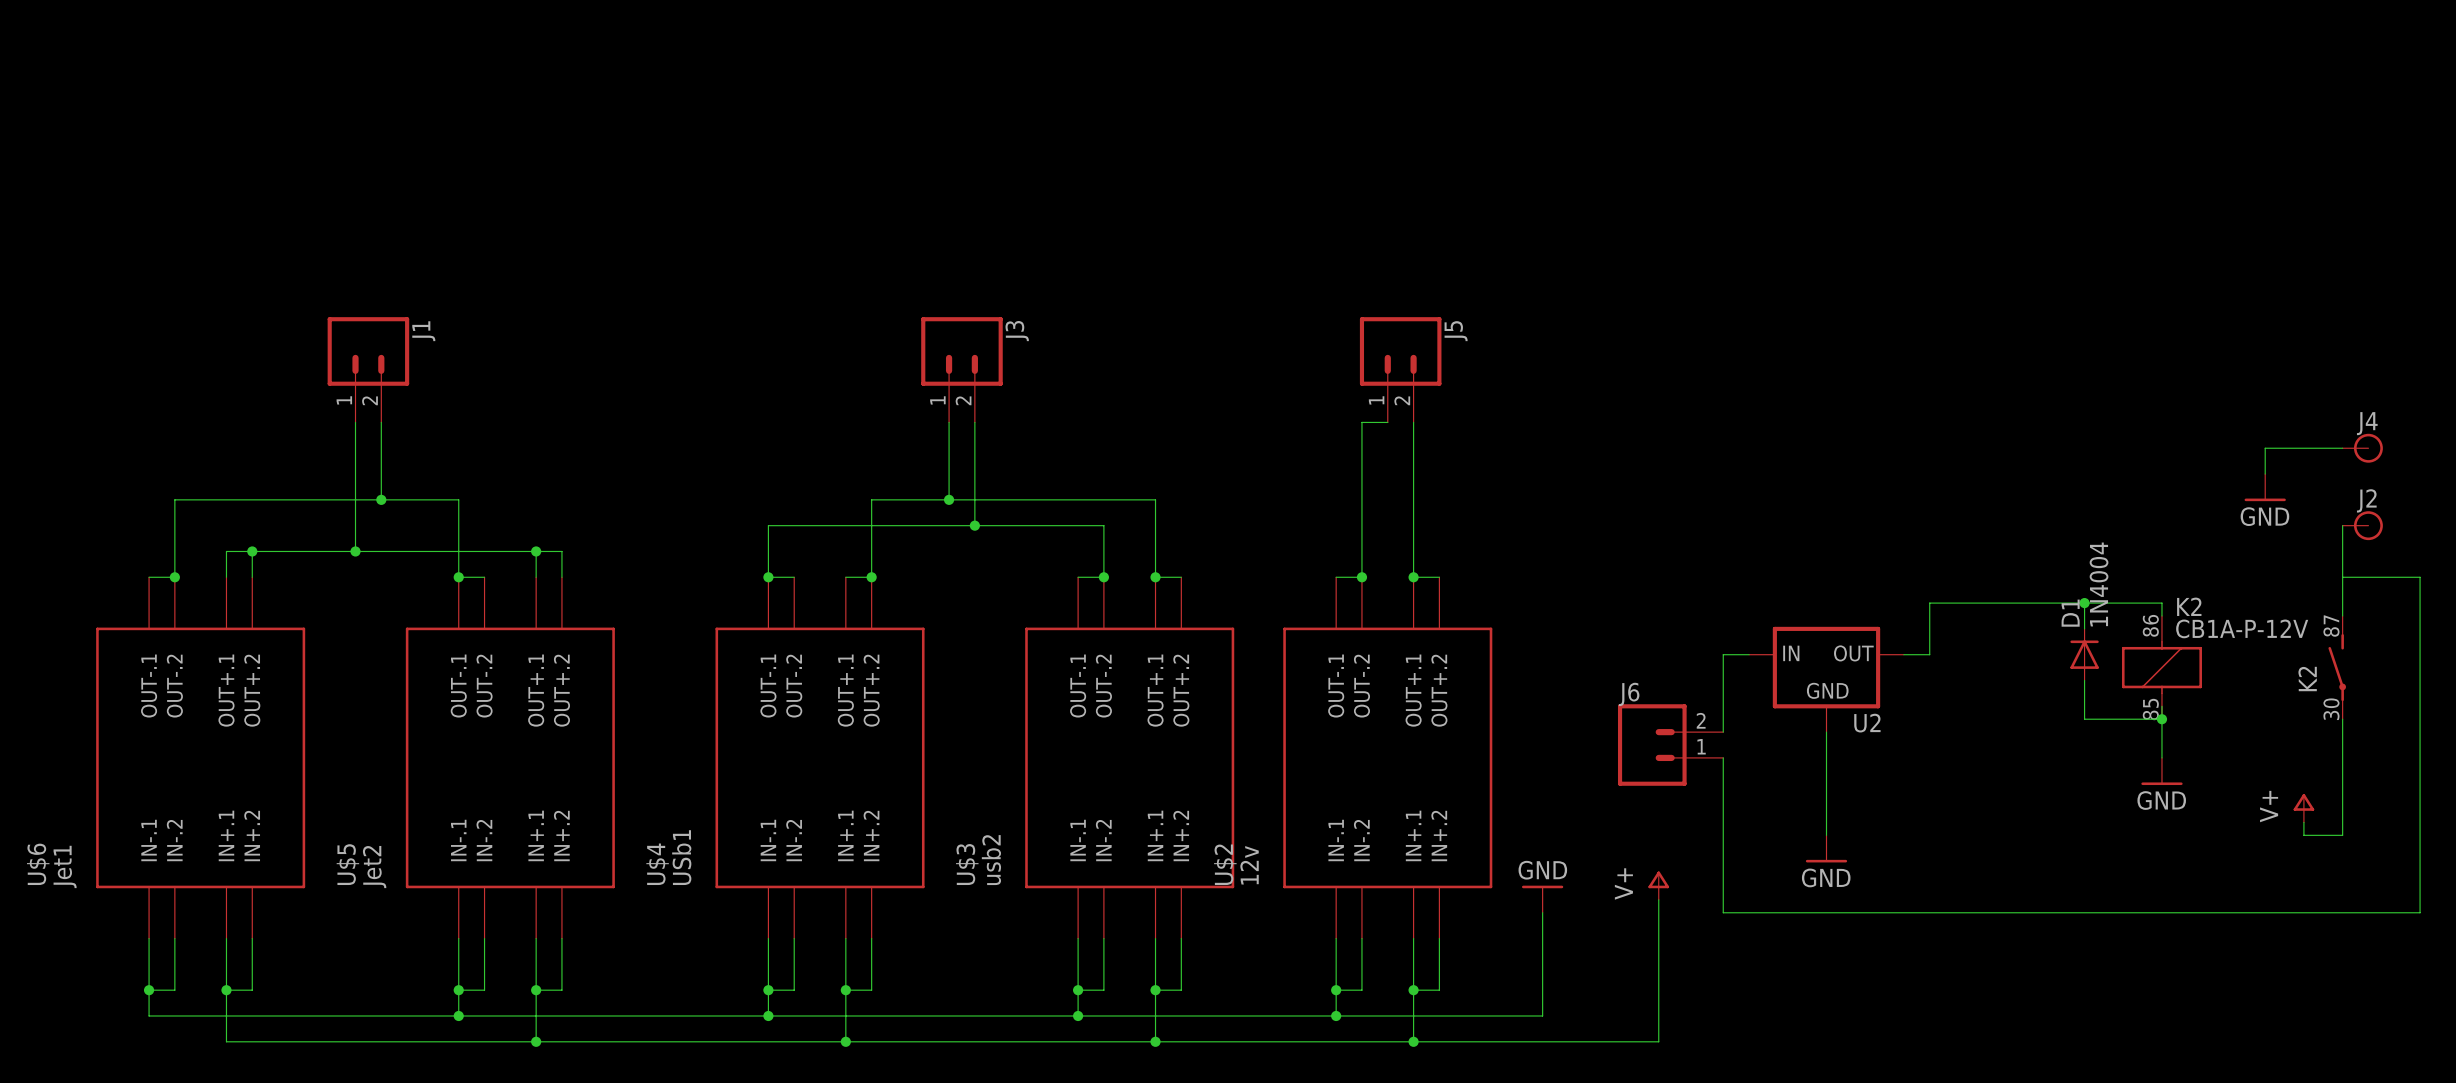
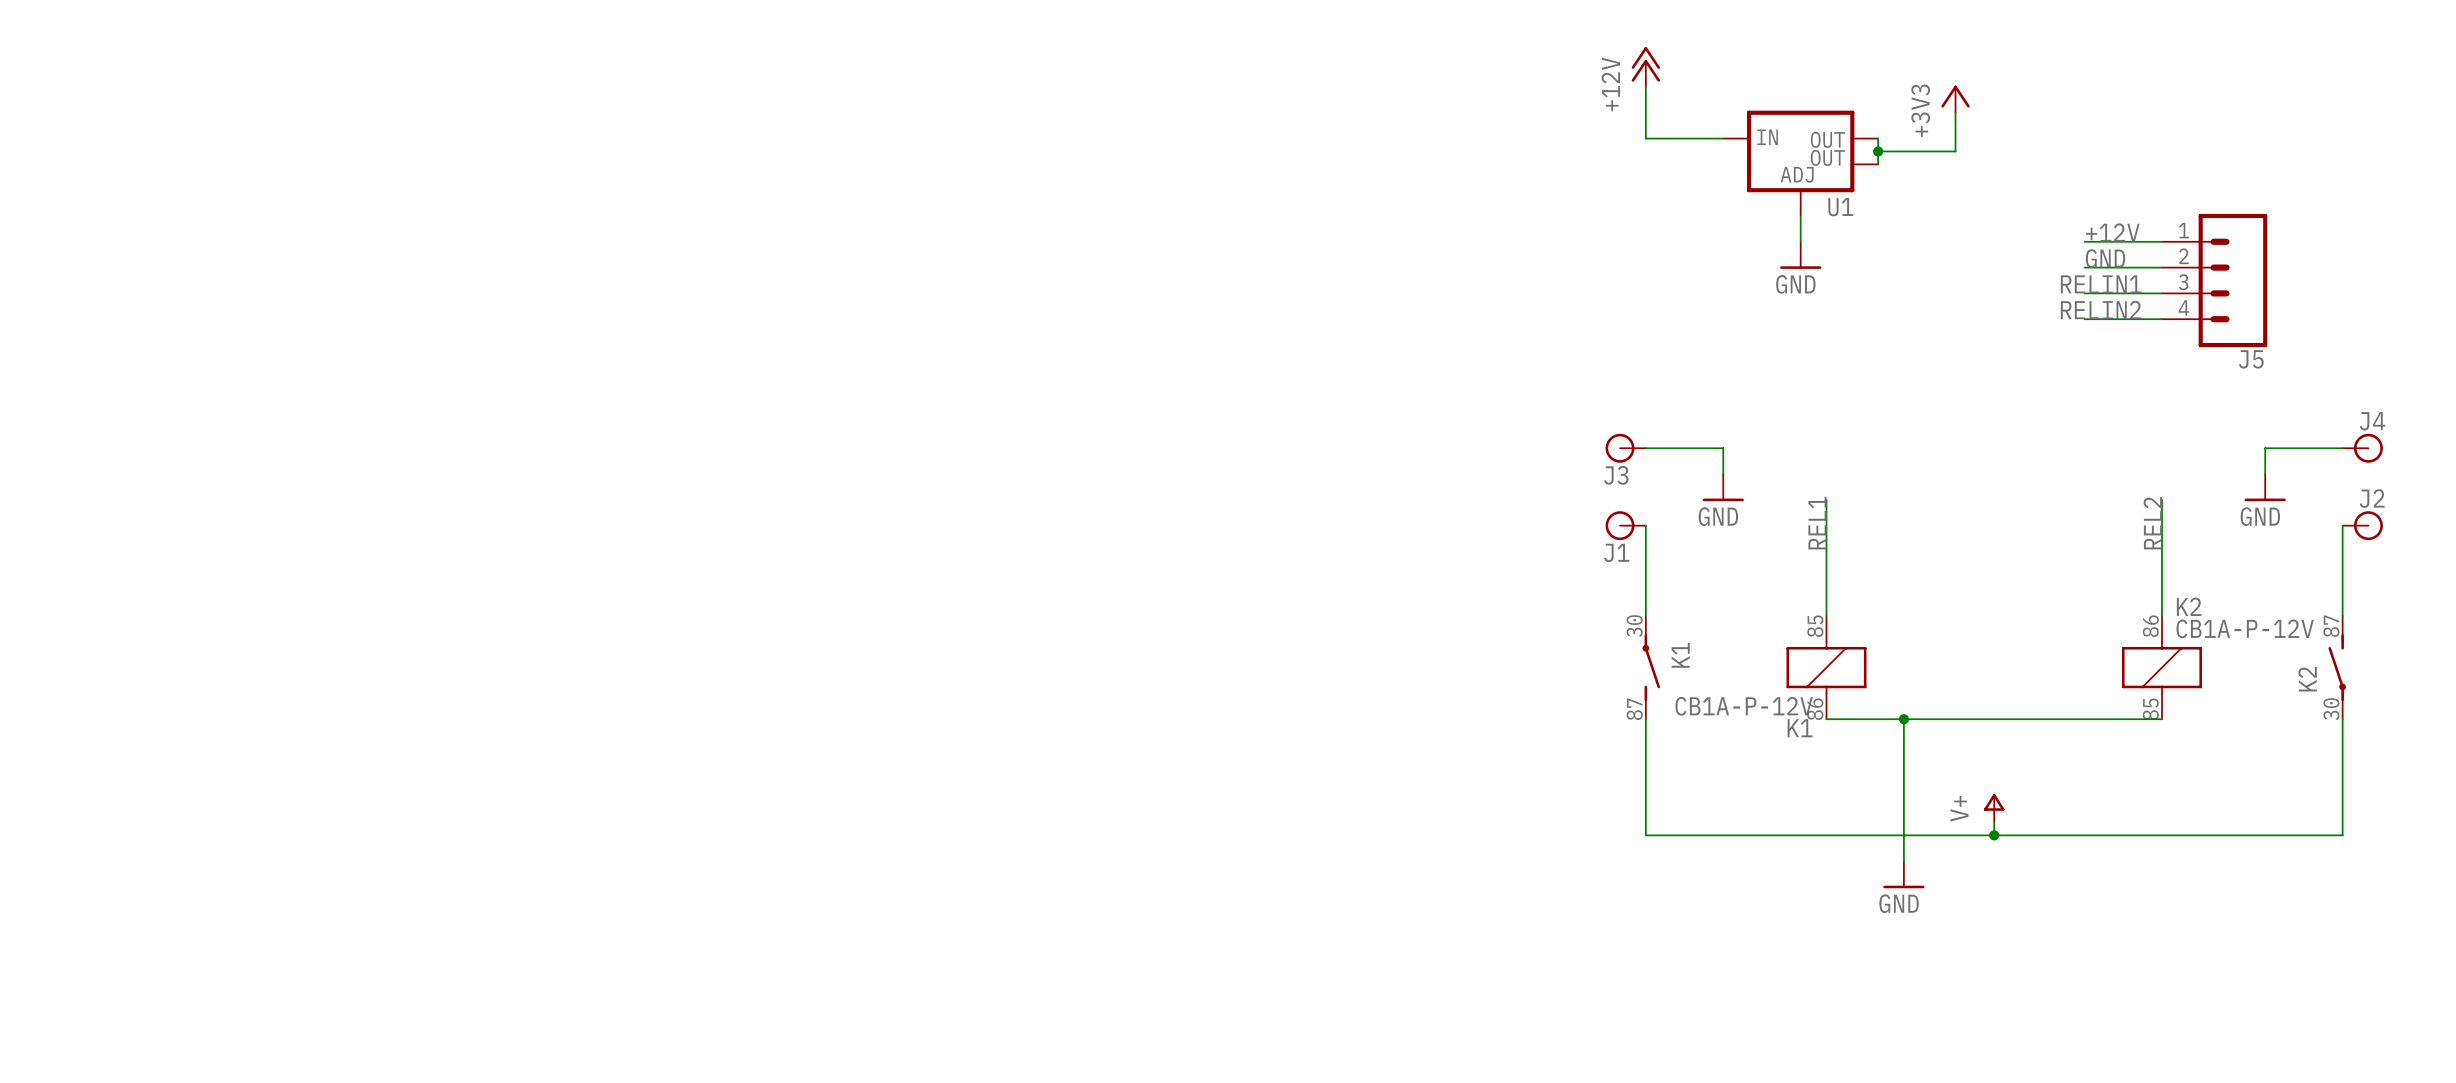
power symbol: none -> +12V (1645, 66)
wire: none -> (1645, 86) (1645, 138) (1723, 138)
power symbol: none -> +3V3 (1955, 99)
wire: none -> (1955, 112) (1955, 151) (1878, 151)
wire: none -> (1878, 138) (1878, 164)
junction: none -> (1878, 151)
U1: none -> (1800, 163)
wire: none -> (1800, 215) (1800, 241)
label: none -> +12V (2112, 232)
wire: none -> (2084, 241) (2161, 241)
power symbol: none -> GND (1800, 255)
label: none -> GND (2105, 258)
wire: none -> (2084, 267) (2161, 267)
label: none -> RELIN1 (2101, 284)
wire: none -> (2084, 293) (2161, 293)
label: none -> RELIN2 (2101, 310)
J1 symbol: [327, 317, 410, 423] -> [1605, 511, 1646, 541]
J3 symbol: [921, 317, 1003, 423] -> [1605, 433, 1646, 463]
J5 symbol: [1359, 317, 1442, 423] -> [2161, 213, 2268, 348]
wire: none -> (2084, 319) (2161, 319)
J1 name position: J1 (423, 331) -> J1 (1616, 552)
J3 name position: J3 (1017, 331) -> J3 (1616, 475)
J5 name position: J5 (1456, 331) -> J5 (2251, 359)
wire: (355, 422) (355, 551) -> none
wire: (381, 422) (381, 499) -> none
wire: (949, 422) (949, 499) -> none
wire: (974, 422) (974, 525) -> none
wire: (1387, 422) (1361, 422) (1361, 577) (1336, 577) -> none
wire: (1413, 422) (1413, 577) (1439, 577) -> none
wire: none -> (1645, 448) (1723, 448) (1723, 474)
power symbol: none -> GND (1723, 487)
junction: (381, 499) -> none
junction: (949, 499) -> none
wire: none -> (1826, 499) (1826, 615)
label: none -> REL1 (1817, 523)
label: none -> REL2 (2152, 523)
junction: (974, 525) -> none
wire: none -> (1645, 525) (1645, 615)
wire: (252, 551) (252, 577) -> none
junction: (252, 551) -> none
junction: (355, 551) -> none
wire: (536, 551) (536, 577) -> none
junction: (536, 551) -> none
wire: (149, 577) (174, 577) (174, 499) (458, 499) (458, 577) (484, 577) -> none
junction: (174, 577) -> none
wire: (226, 577) (226, 551) (561, 551) (561, 577) -> none
junction: (458, 577) -> none
junction: (768, 577) -> none
wire: (794, 577) (768, 577) (768, 525) (1103, 525) (1103, 577) (1078, 577) -> none
wire: (845, 577) (871, 577) (871, 499) (1155, 499) (1155, 577) (1181, 577) -> none
junction: (871, 577) -> none
junction: (1103, 577) -> none
junction: (1155, 577) -> none
junction: (1361, 577) -> none
junction: (1413, 577) -> none
wire: (2342, 577) (2420, 577) (2420, 912) (1723, 912) (1723, 757) -> none
wire: (2084, 603) (2084, 628) -> none
junction: (2084, 603) -> none
wire: (2161, 603) (1929, 603) (1929, 654) (1903, 654) -> (2161, 603) (2161, 499)
wire: (1749, 654) (1723, 654) (1723, 732) -> none
D1: 1N4004 (2084, 654) -> none
K1: none -> (1651, 667)
K1: none -> CB1A-P-12V (1826, 667)
U2: (1826, 679) -> none
wire: (2084, 680) (2084, 719) -> (1826, 719) (2084, 719)
wire: (2161, 706) (2161, 757) -> none
wire: none -> (1903, 719) (1903, 861)
junction: none -> (1903, 719)
junction: (2161, 719) -> none
wire: (1826, 732) (1826, 835) -> none
J6: (1670, 745) -> none
U$6: Jet1 (200, 757) -> none
U$5: Jet2 (510, 757) -> none
U$4: USb1 (820, 757) -> none
U$3: usb2 (1129, 757) -> none
U$2: 12v (1387, 757) -> none
power symbol: GND (2161, 771) -> none
power symbol: none -> V+ (1994, 808)
power symbol: V+ (2303, 808) -> none
wire: none -> (1994, 822) (1994, 835)
wire: (2303, 822) (2303, 835) -> (1645, 719) (1645, 835) (2303, 835)
junction: none -> (1994, 835)
power symbol position: GND (1826, 848) -> GND (1903, 874)
power symbol: V+ (1658, 885) -> none
power symbol: GND (1542, 899) -> none
wire: (1658, 899) (1658, 1041) (226, 1041) (226, 938) -> none
wire: (1542, 912) (1542, 1015) (149, 1015) (149, 938) -> none
wire: (174, 938) (174, 990) (149, 990) -> none
wire: (252, 938) (252, 990) (226, 990) -> none
wire: (458, 938) (458, 1015) -> none
wire: (484, 938) (484, 990) (458, 990) -> none
wire: (536, 938) (536, 1041) -> none
wire: (561, 938) (561, 990) (536, 990) -> none
wire: (768, 938) (768, 1015) -> none
wire: (794, 938) (794, 990) (768, 990) -> none
wire: (845, 938) (845, 1041) -> none
wire: (871, 938) (871, 990) (845, 990) -> none
wire: (1078, 938) (1078, 1015) -> none
wire: (1103, 938) (1103, 990) (1078, 990) -> none
wire: (1155, 938) (1155, 1041) -> none
wire: (1181, 938) (1181, 990) (1155, 990) -> none
wire: (1336, 938) (1336, 1015) -> none
wire: (1361, 938) (1361, 990) (1336, 990) -> none
wire: (1413, 938) (1413, 1041) -> none
wire: (1439, 938) (1439, 990) (1413, 990) -> none
junction: (149, 990) -> none
junction: (226, 990) -> none
junction: (458, 990) -> none
junction: (536, 990) -> none
junction: (768, 990) -> none
junction: (845, 990) -> none
junction: (1078, 990) -> none
junction: (1155, 990) -> none
junction: (1336, 990) -> none
junction: (1413, 990) -> none
junction: (458, 1015) -> none
junction: (768, 1015) -> none
junction: (1078, 1015) -> none
junction: (1336, 1015) -> none
junction: (536, 1041) -> none
junction: (845, 1041) -> none
junction: (1155, 1041) -> none
junction: (1413, 1041) -> none

